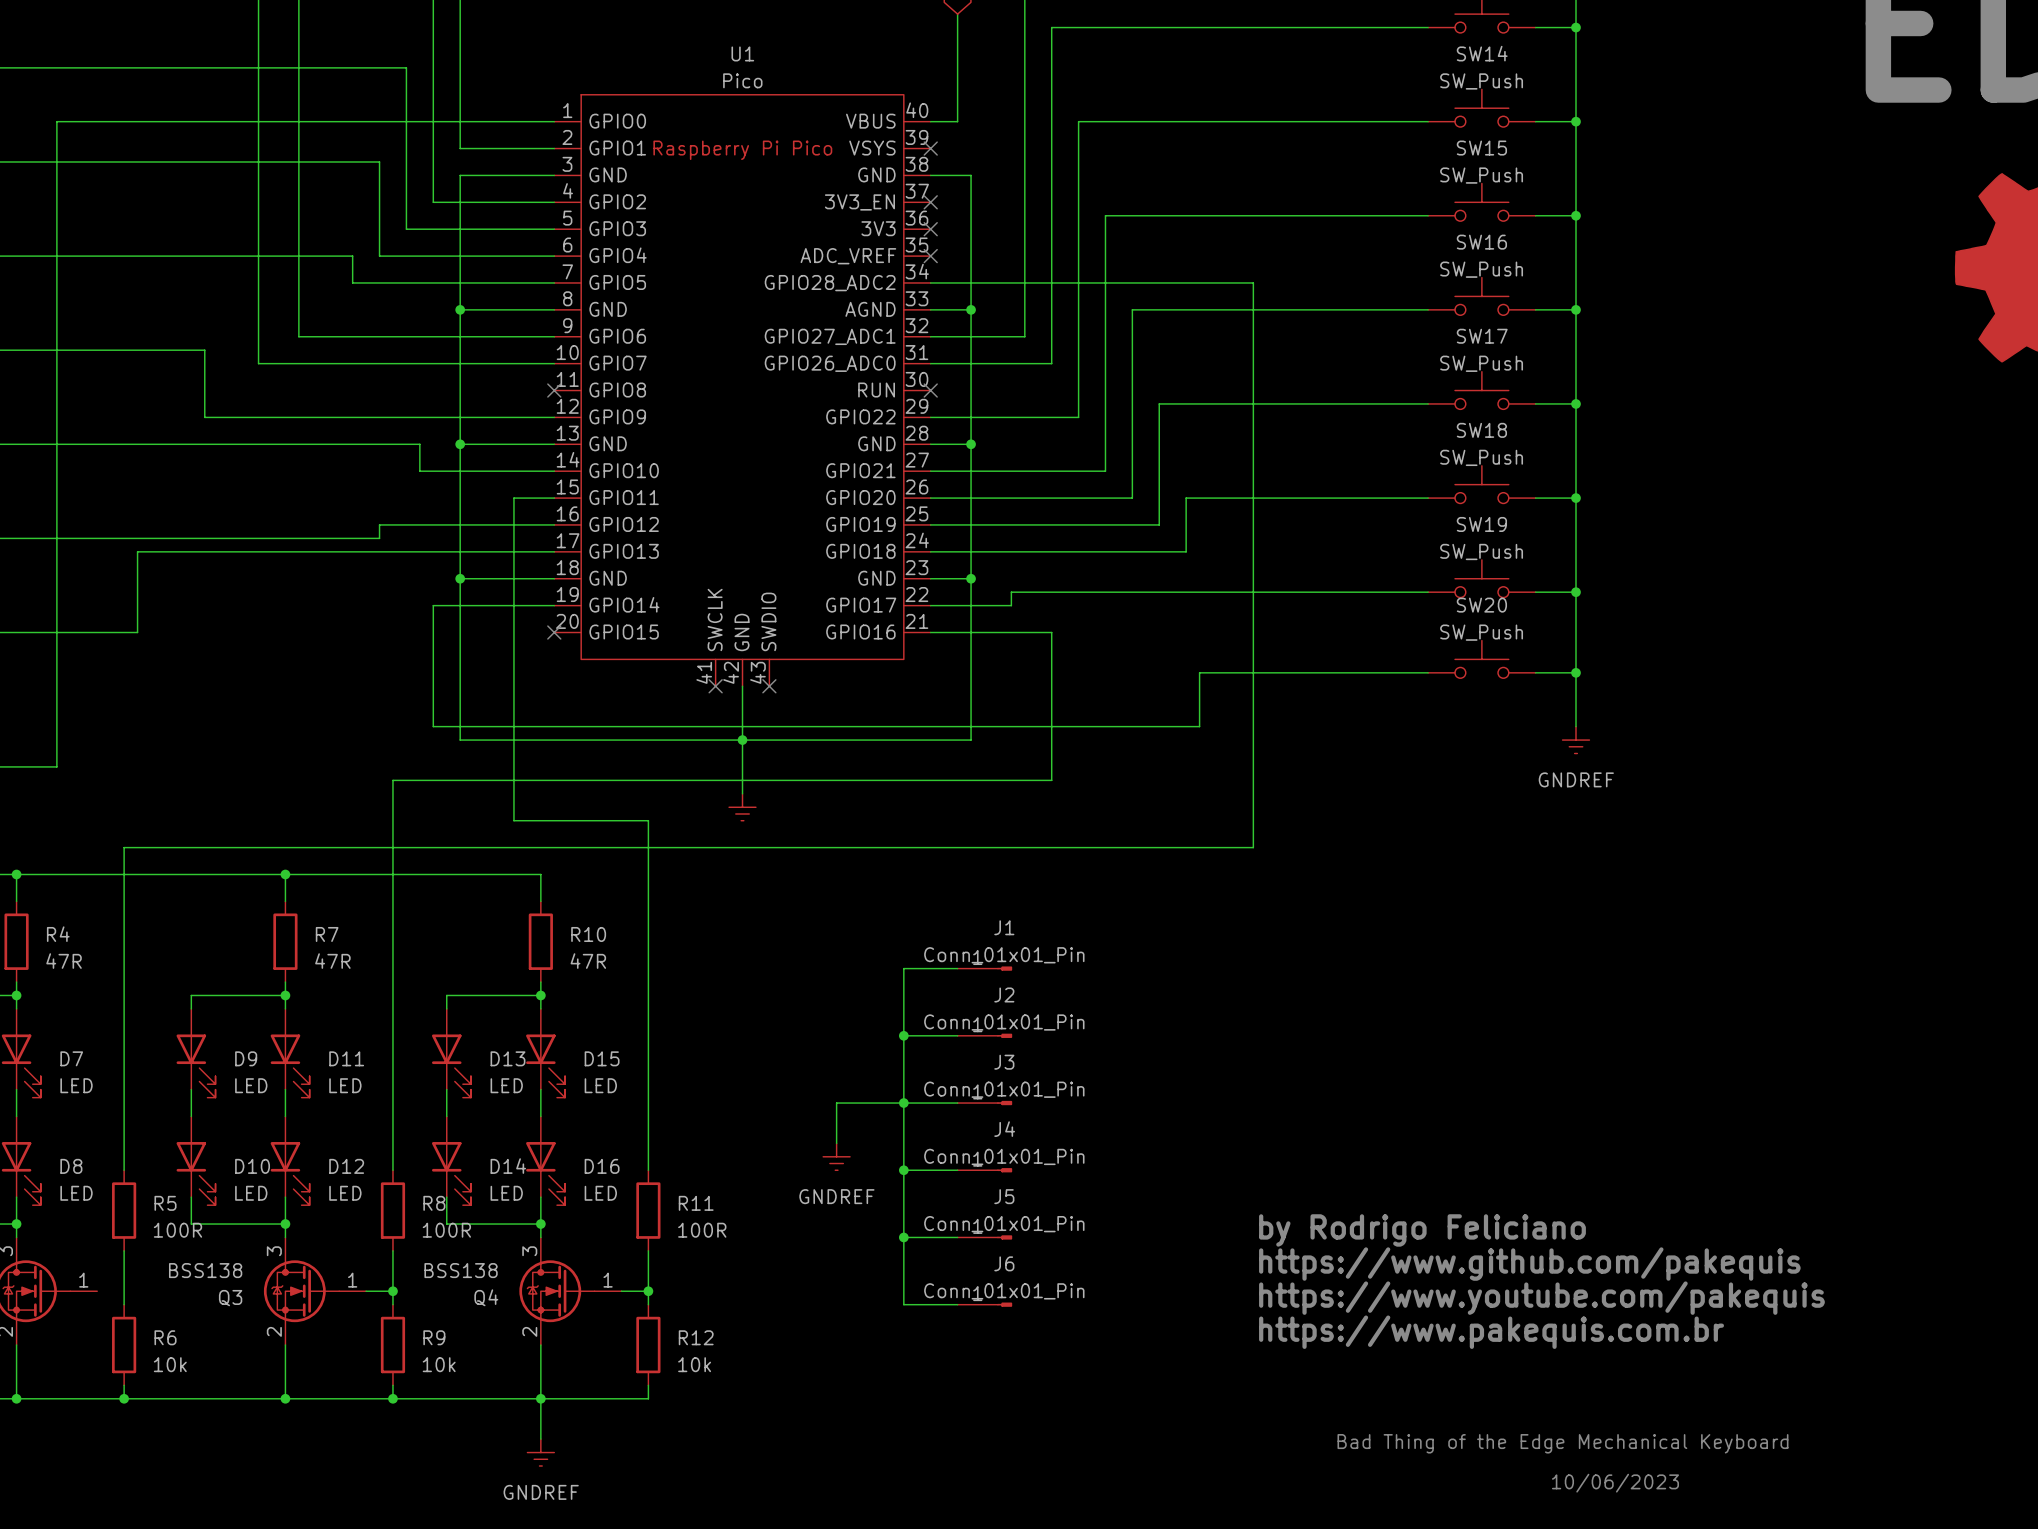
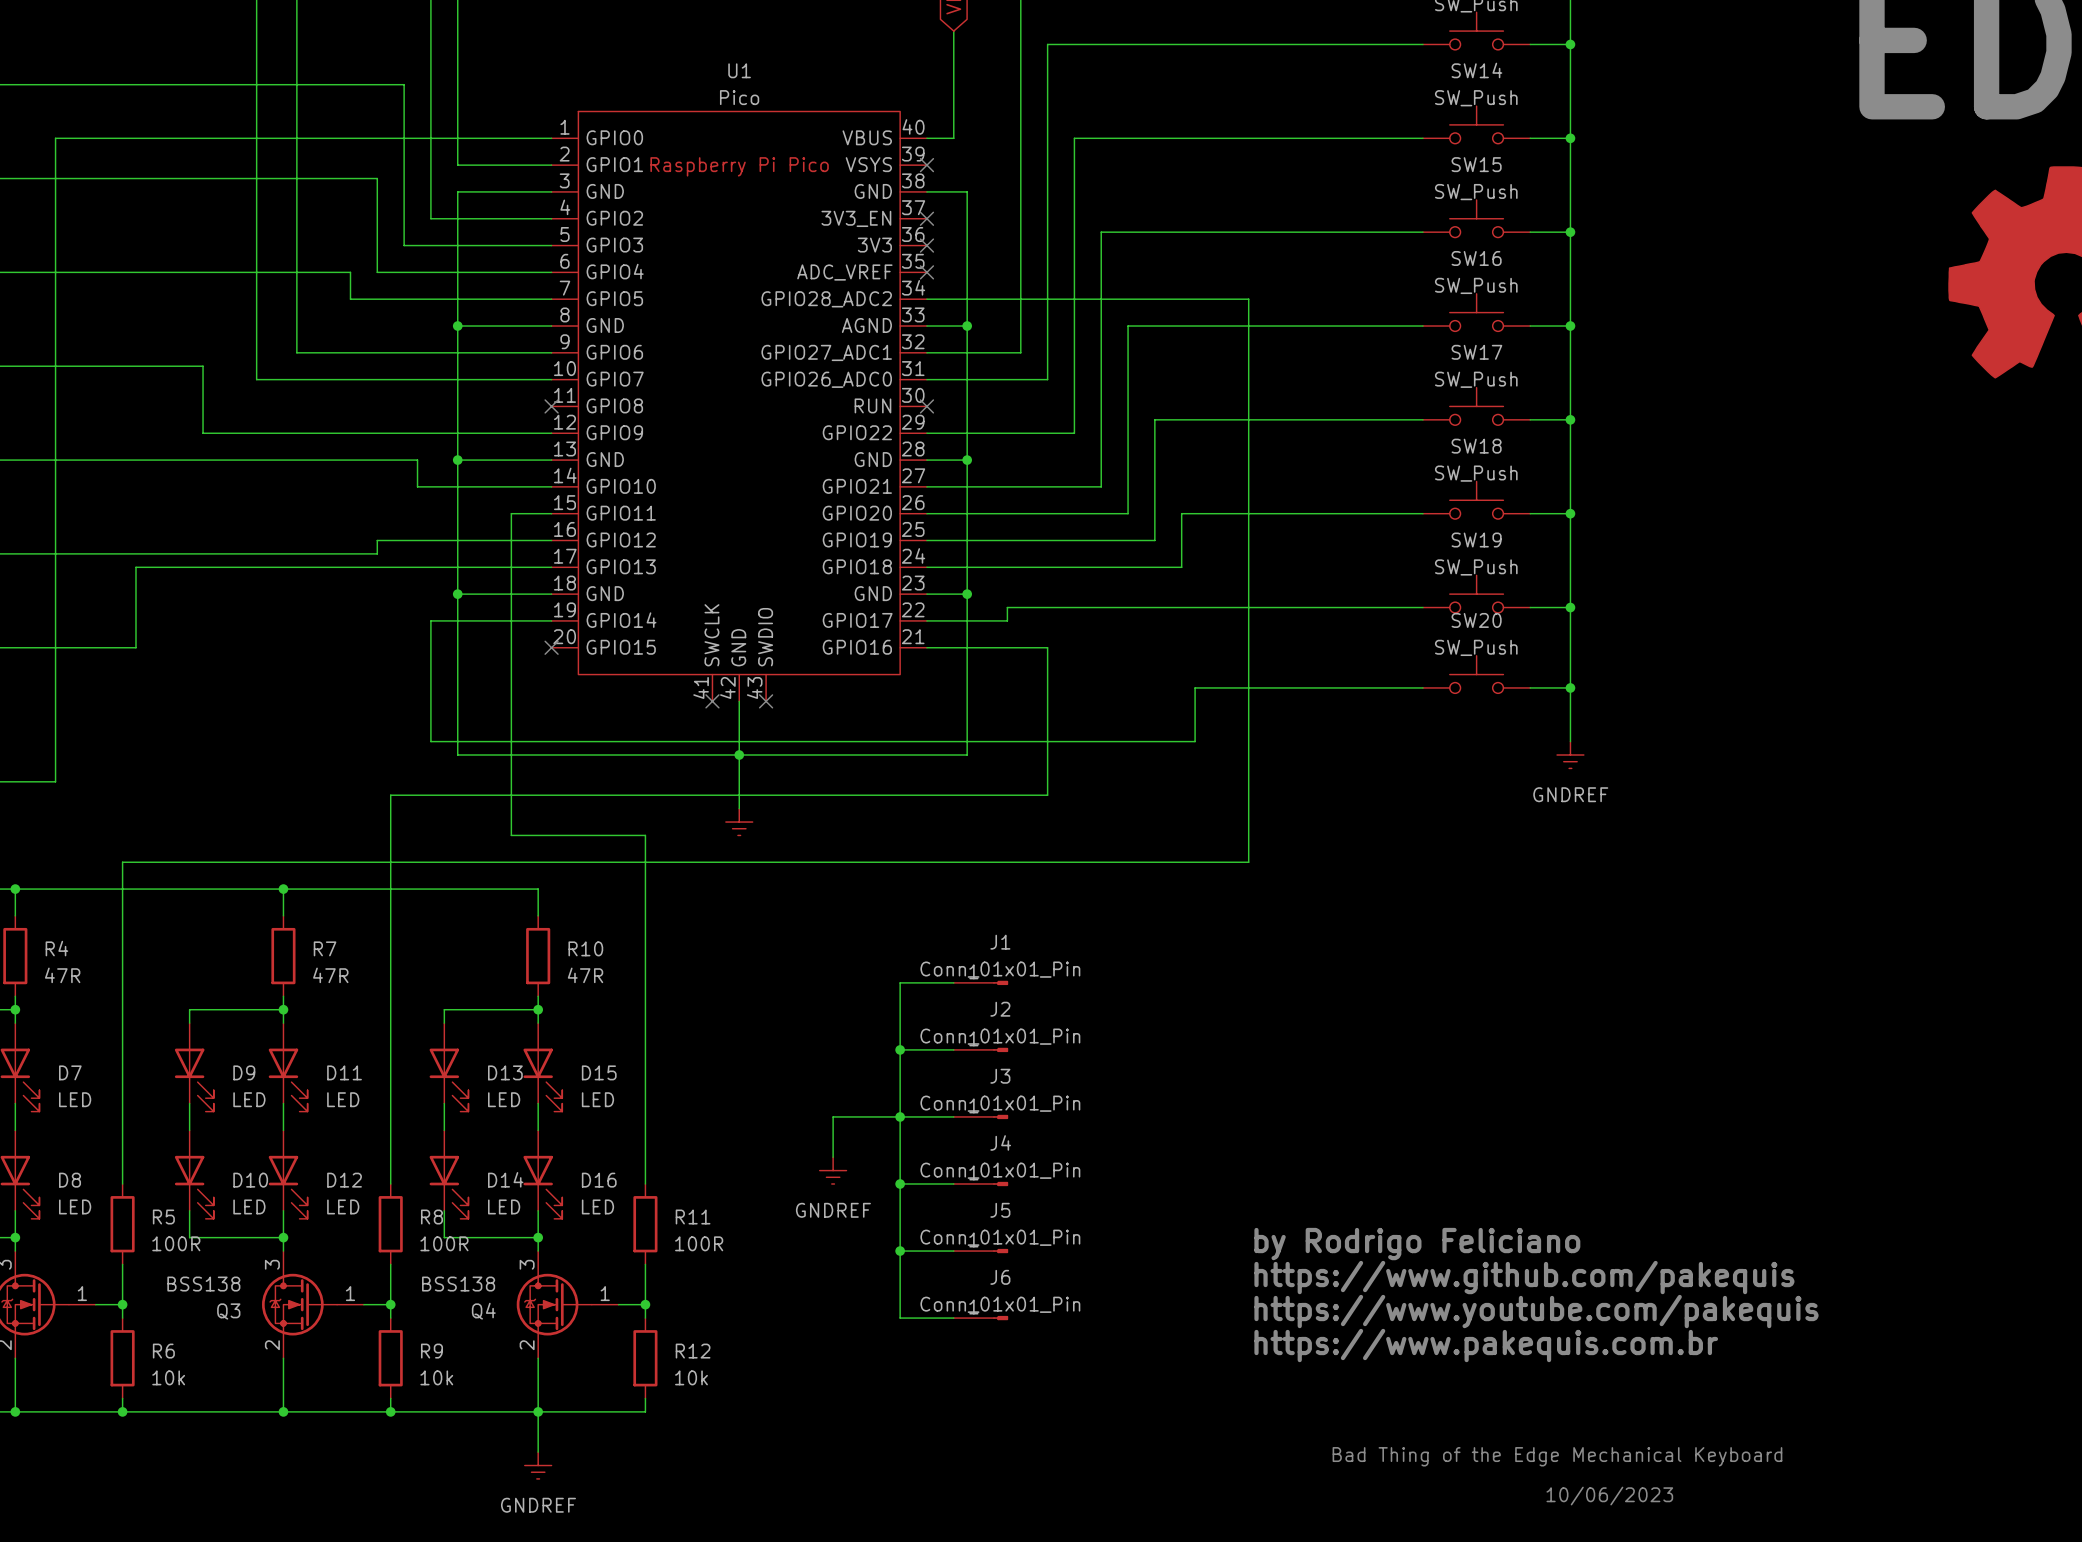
wire: none -> (95, 1304) (122, 1304)
junction: none -> (122, 1304)

